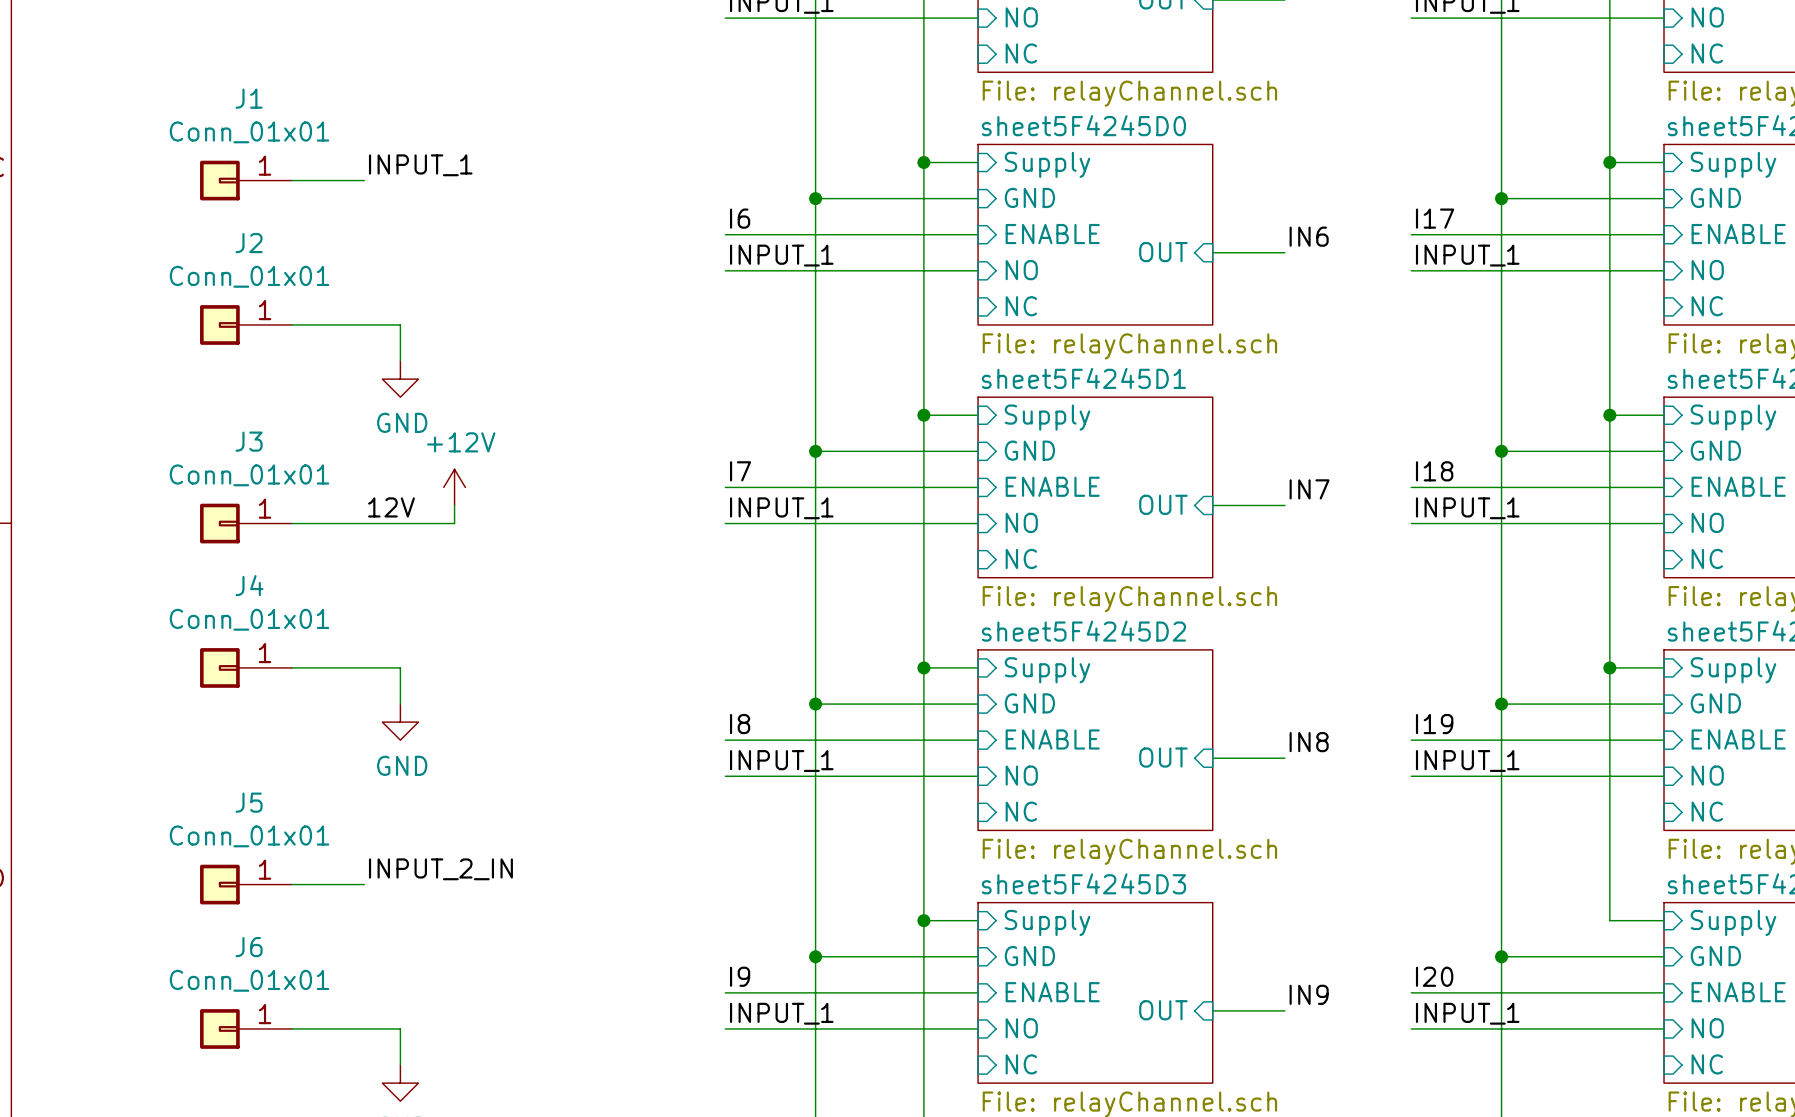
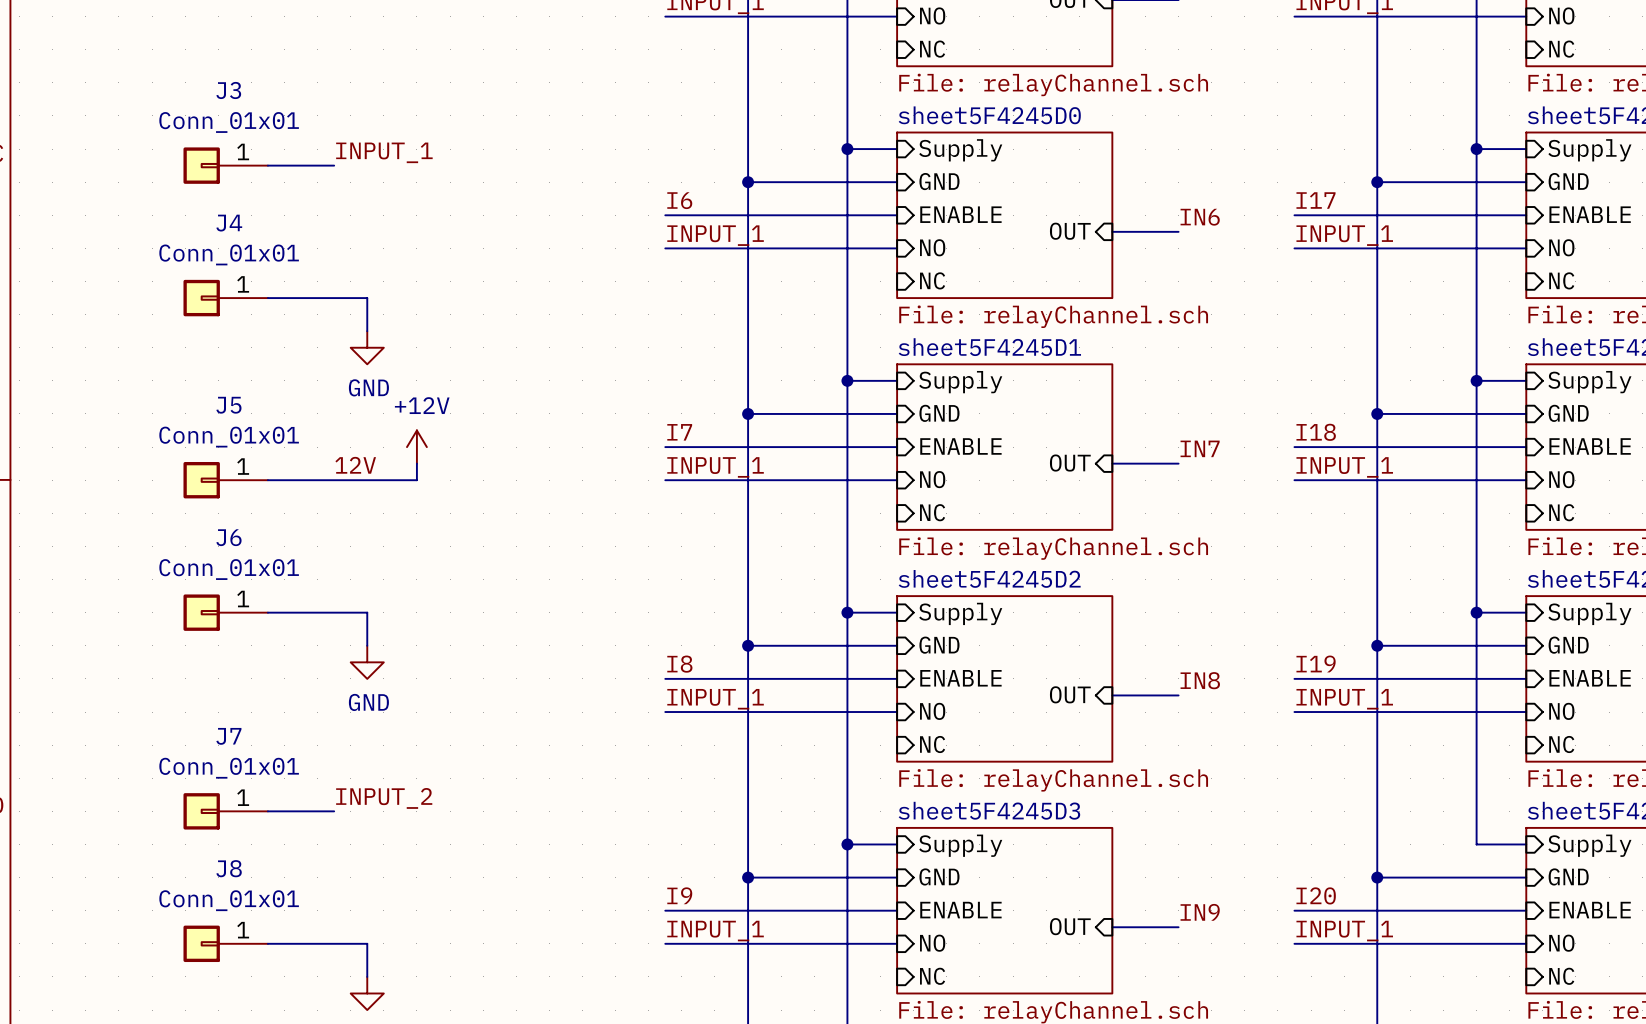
J1 name: J1 (249, 98) -> J3 (228, 90)
J2 name: J2 (249, 243) -> J4 (229, 223)
J3 name: J3 (249, 441) -> J5 (228, 405)
J4 name: J4 (249, 585) -> J6 (228, 537)
J5 name: J5 (249, 802) -> J7 (228, 736)
label: INPUT_2_IN (440, 869) -> INPUT_2 (384, 798)
J6 name: J6 (249, 947) -> J8 (229, 868)

